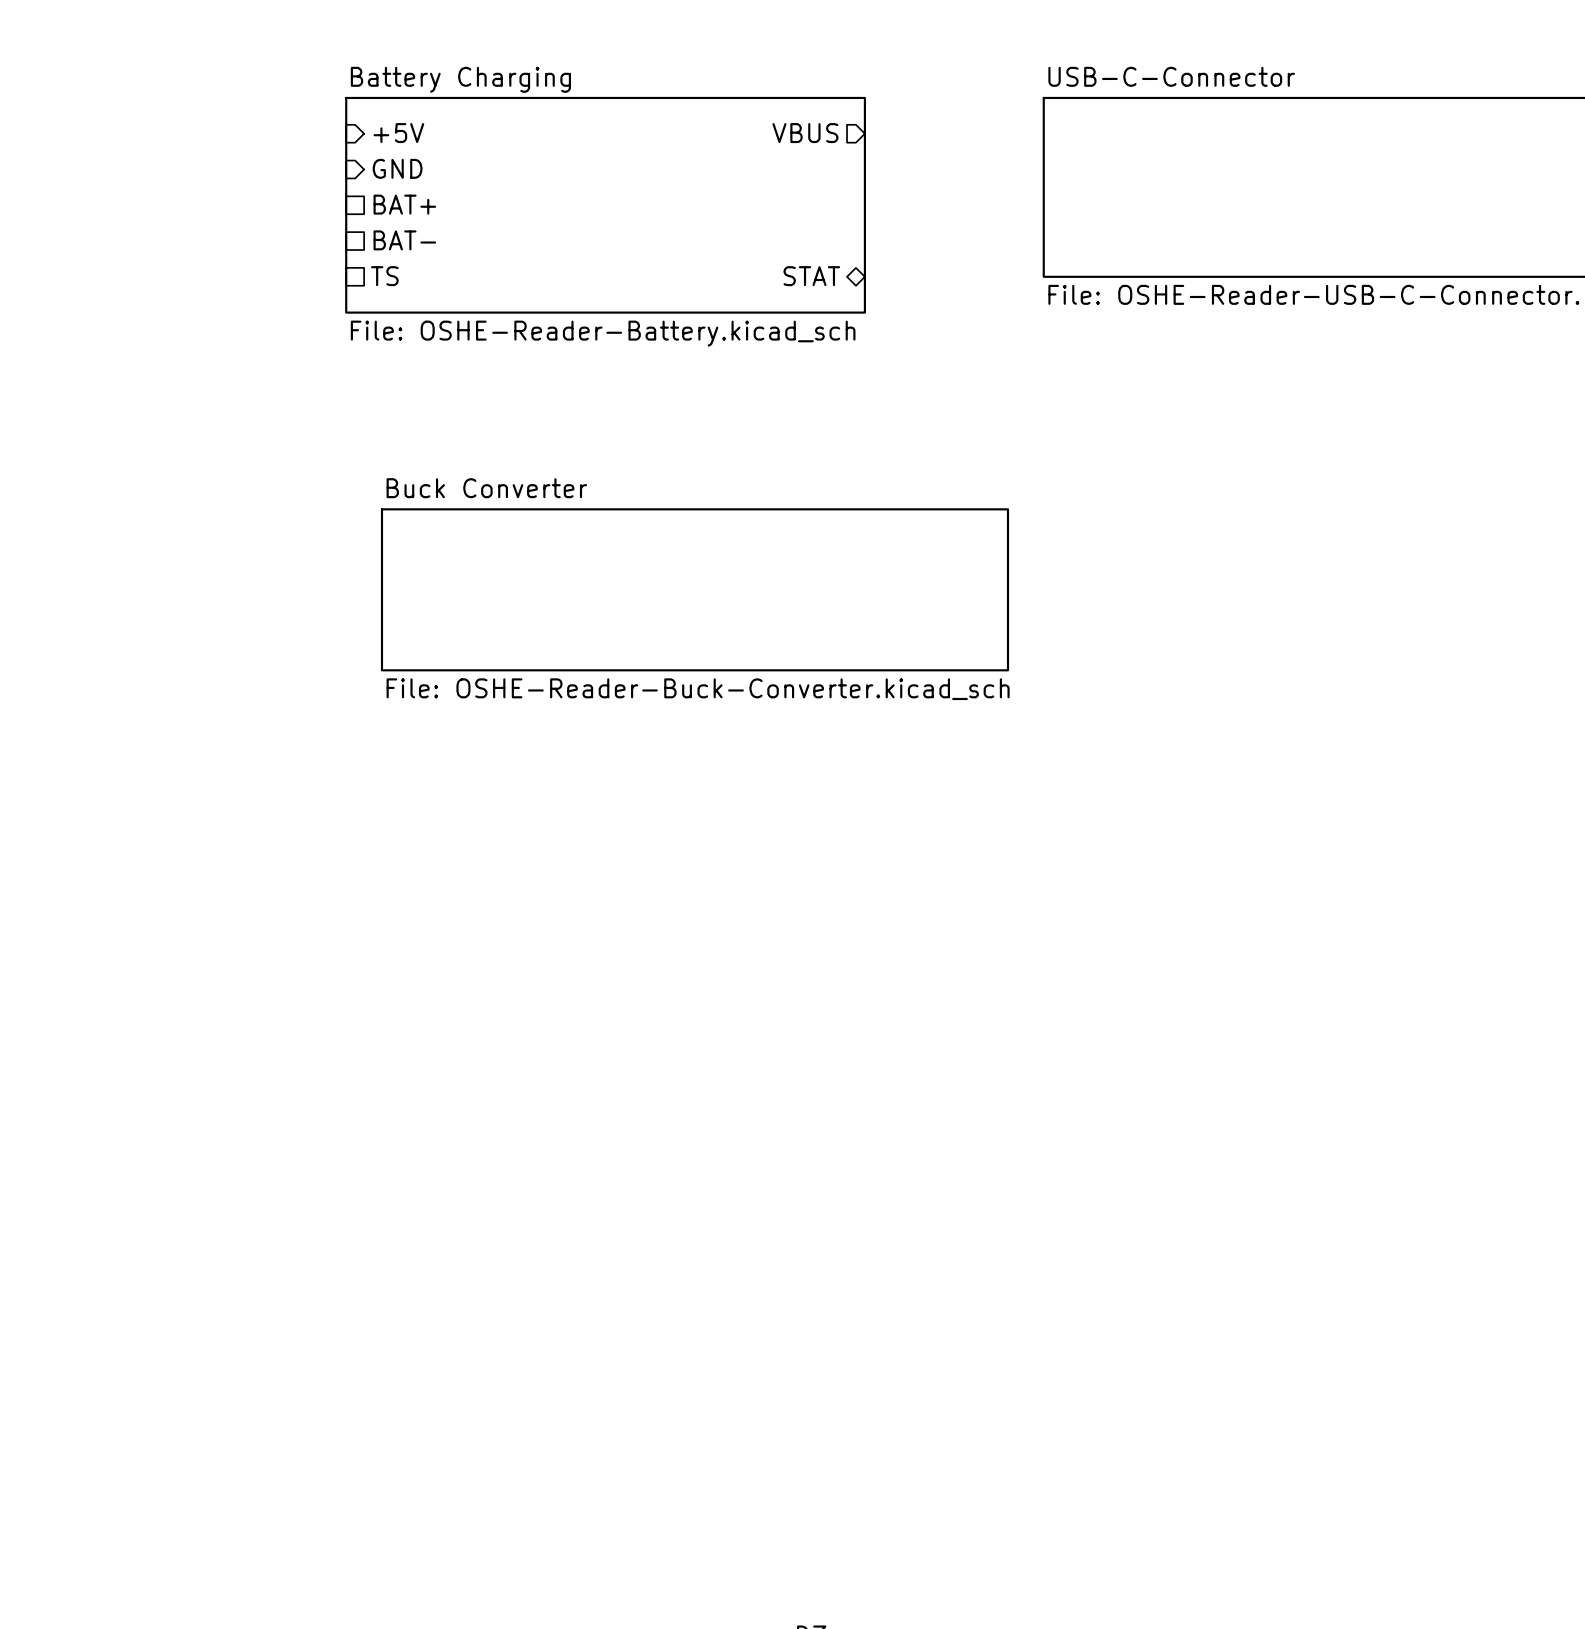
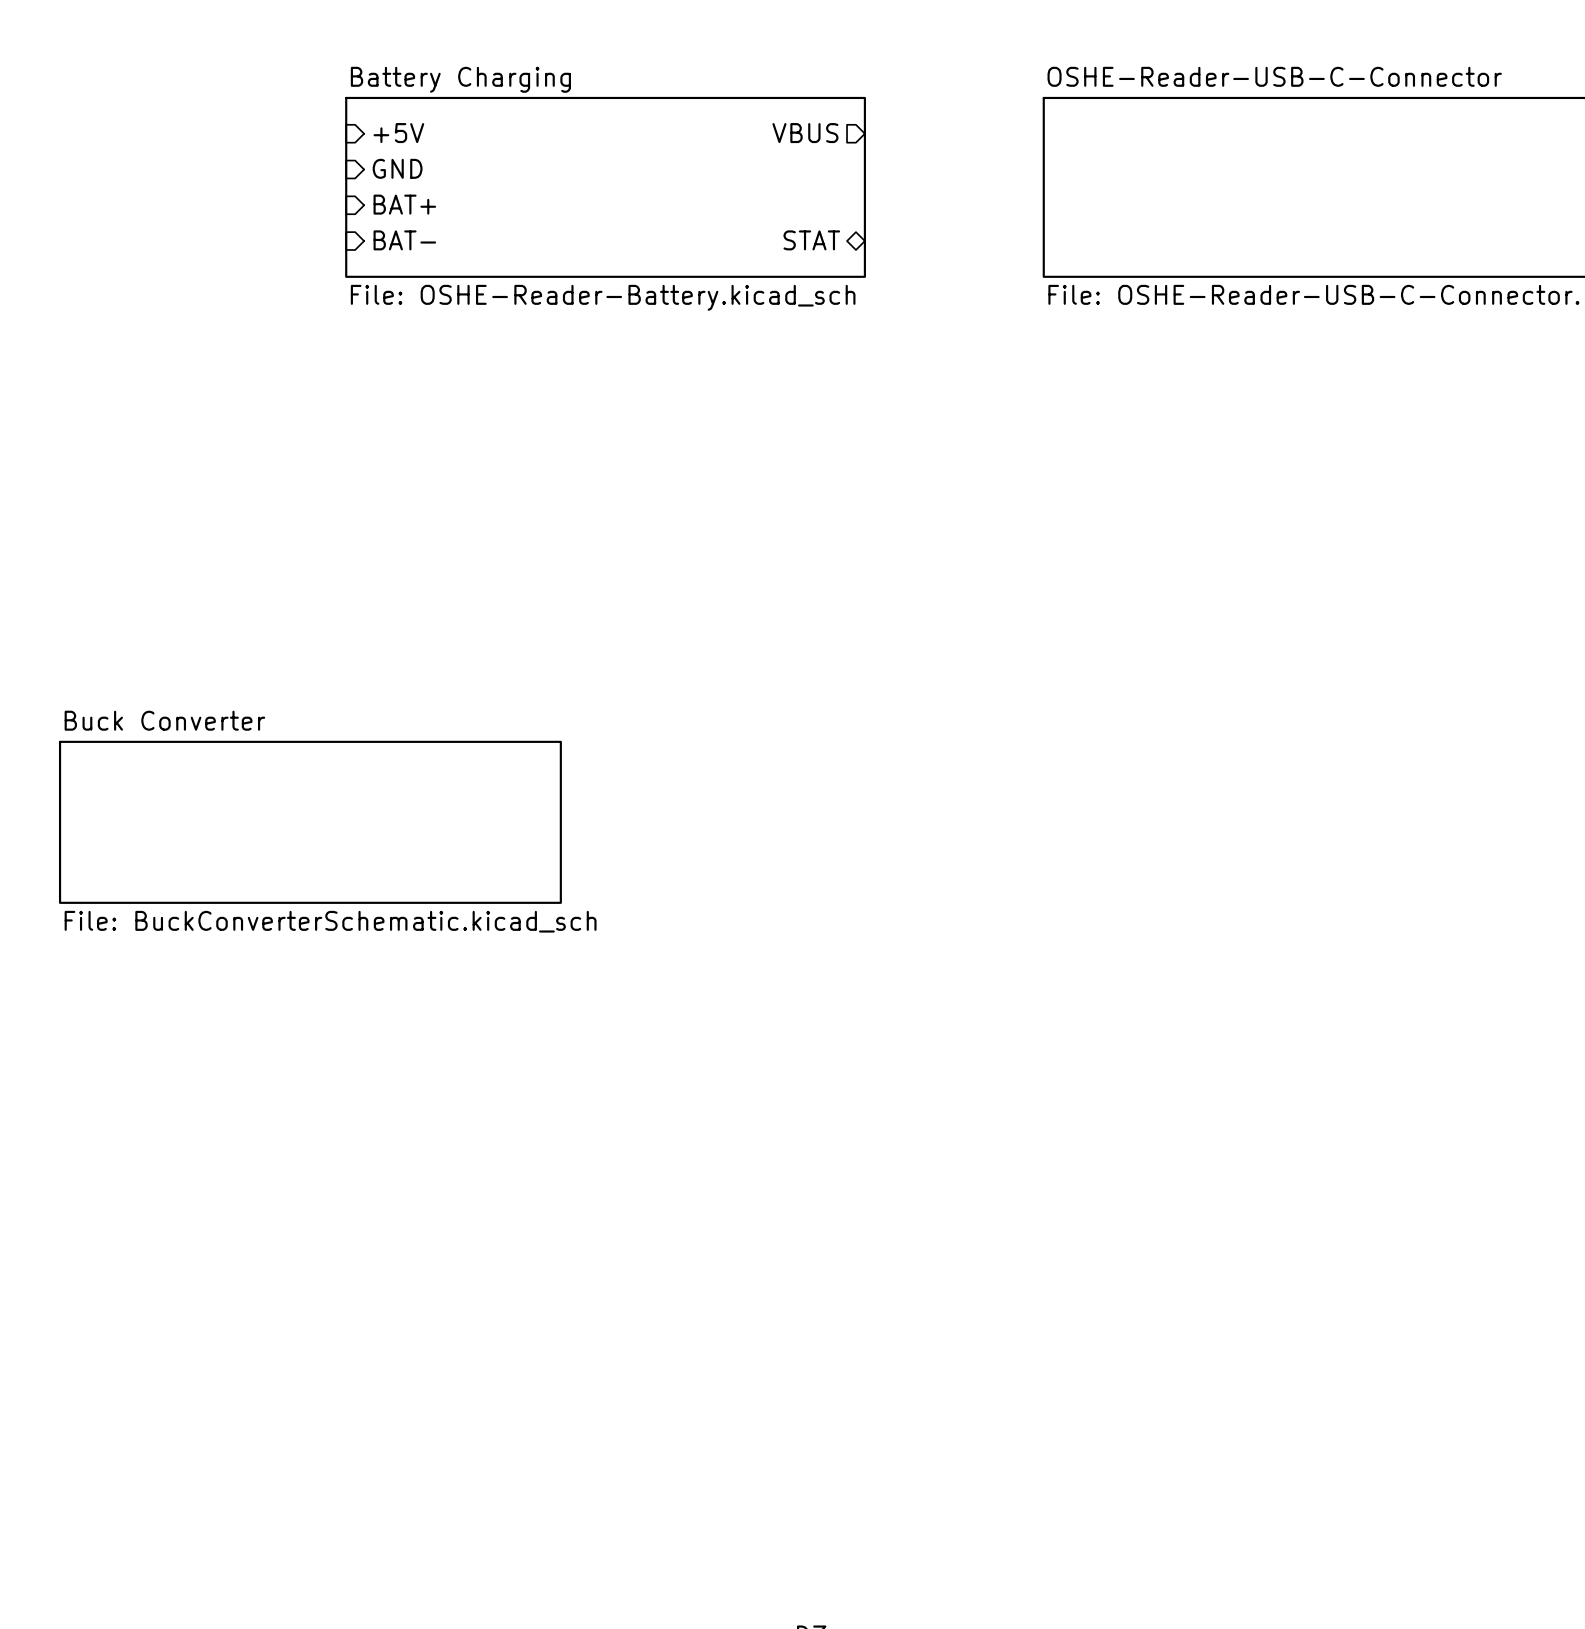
sheet USB-C-Connector name: USB-C-Connector (1171, 76) -> OSHE-Reader-USB-C-Connector (1274, 76)
sheet Battery Charging: none -> File: OSHE-Reader-Battery.kicad_sch (605, 187)
sheet pin shape: passive (404, 204) -> input (404, 204)
sheet Battery Charging: File: OSHE-Reader-Battery.kicad_sch (605, 205) -> none
sheet pin shape: passive (404, 240) -> input (404, 240)
sheet pin: TS (384, 276) -> none
sheet pin position: STAT (811, 276) -> STAT (811, 240)
sheet Buck Converter: File: OSHE-Reader-Buck-Converter.kicad_sch (694, 589) -> none
sheet Buck Converter: none -> File: BuckConverterSchematic.kicad_sch (310, 822)

